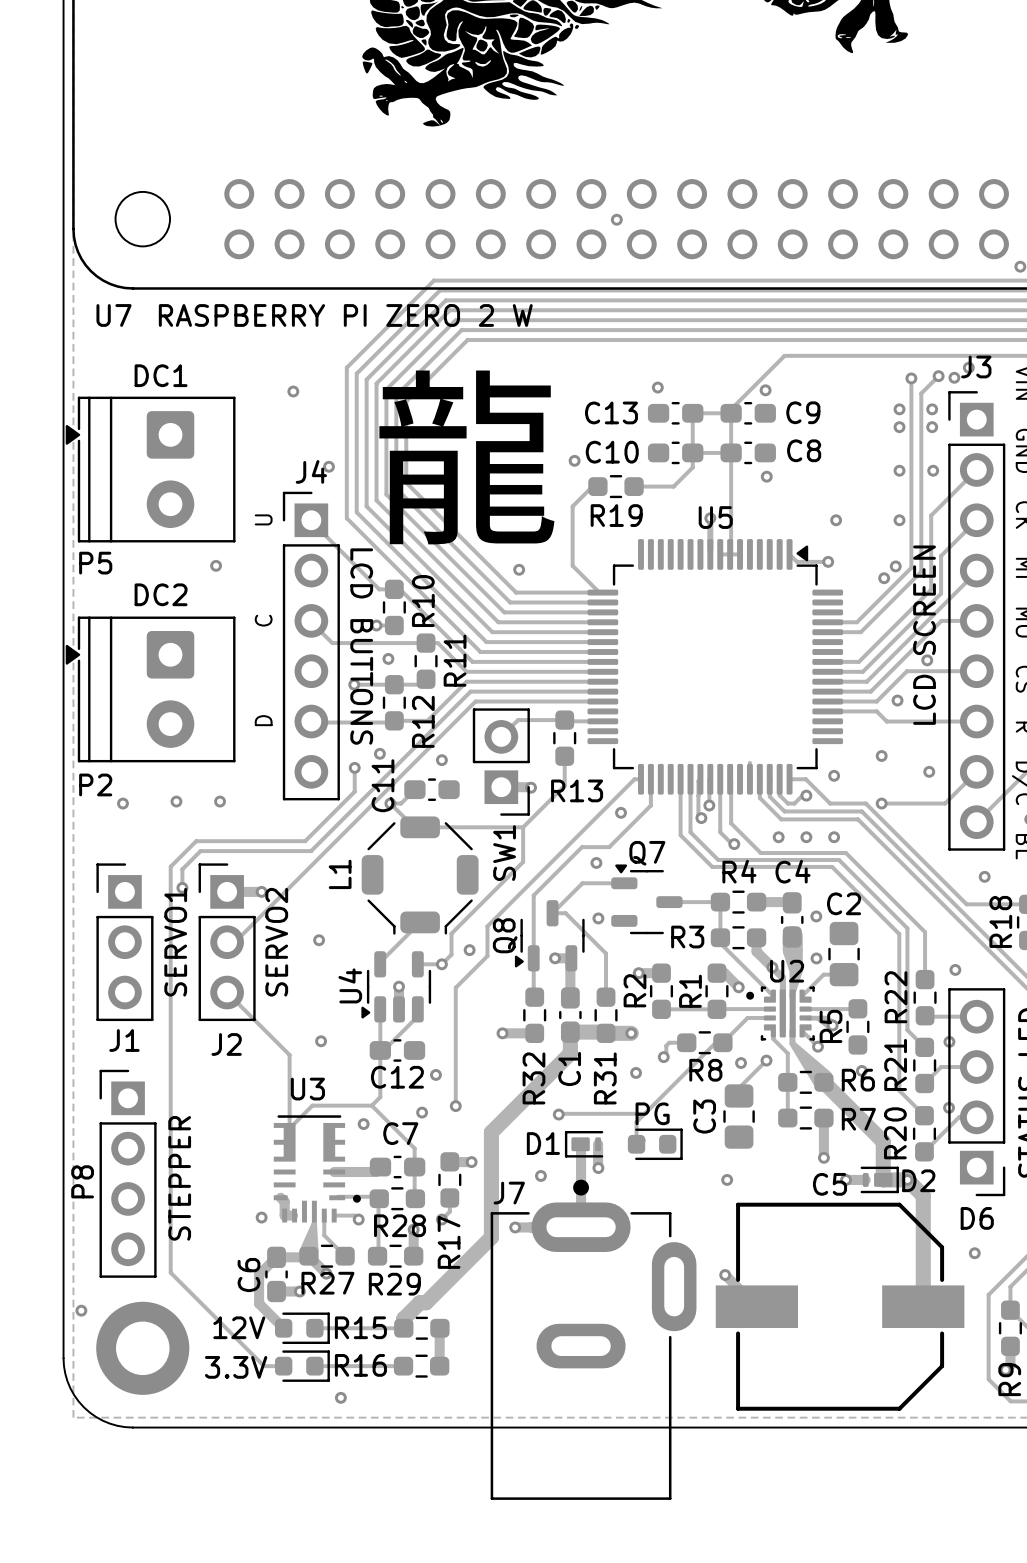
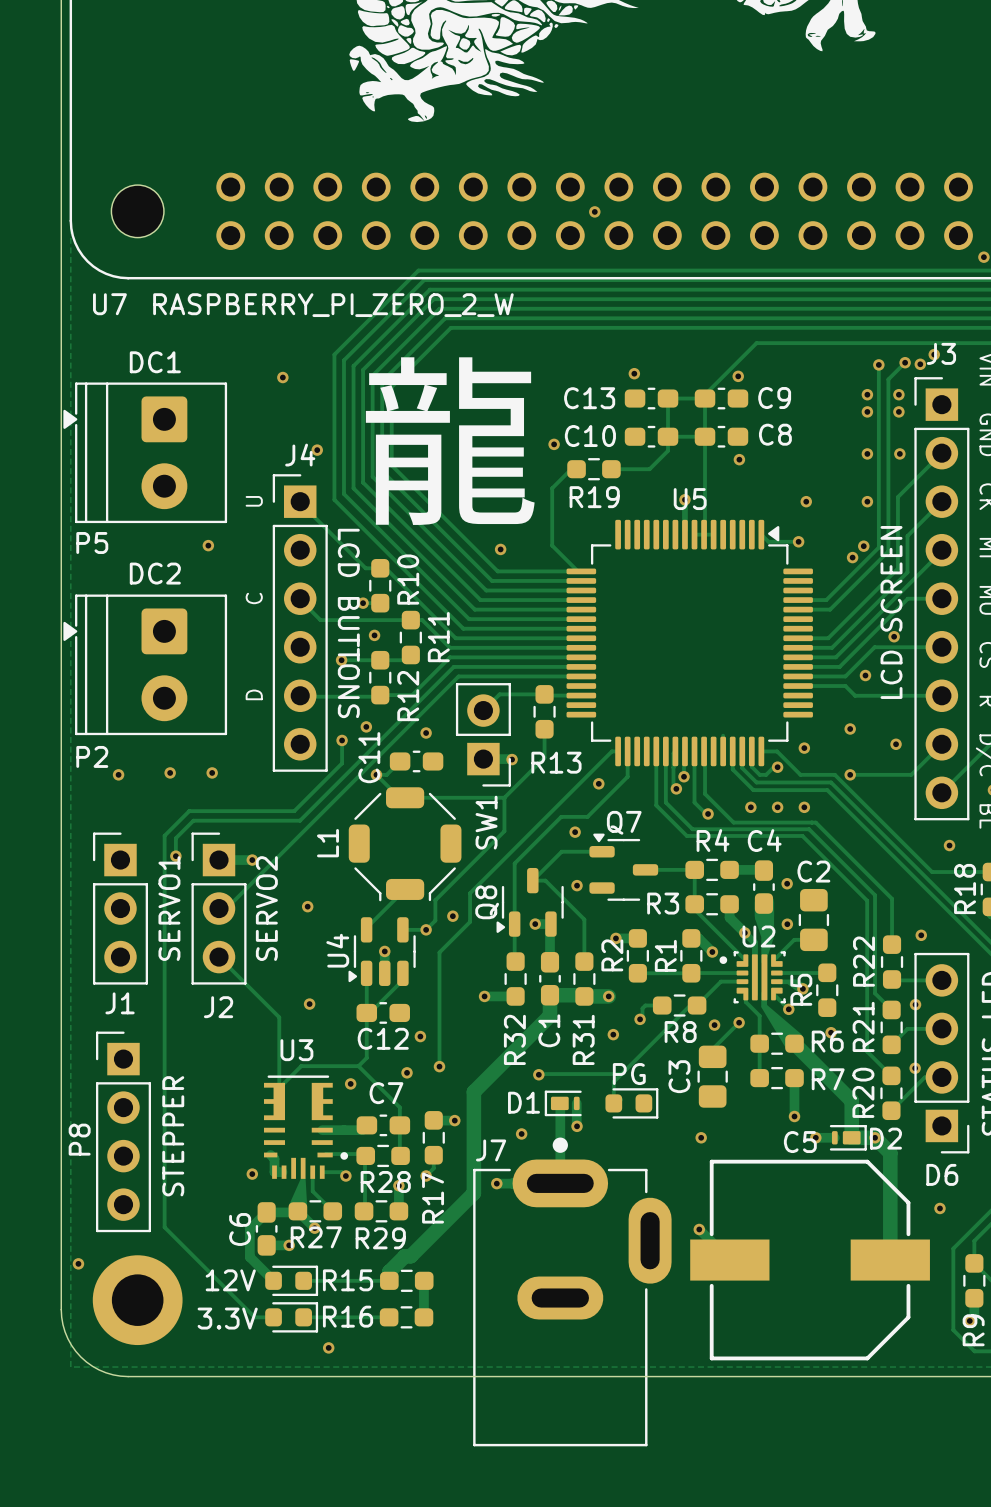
U7 value: RASPBERRY PI ZERO 2 W (345, 315) -> RASPBERRY_PI_ZERO_2_W (333, 305)

